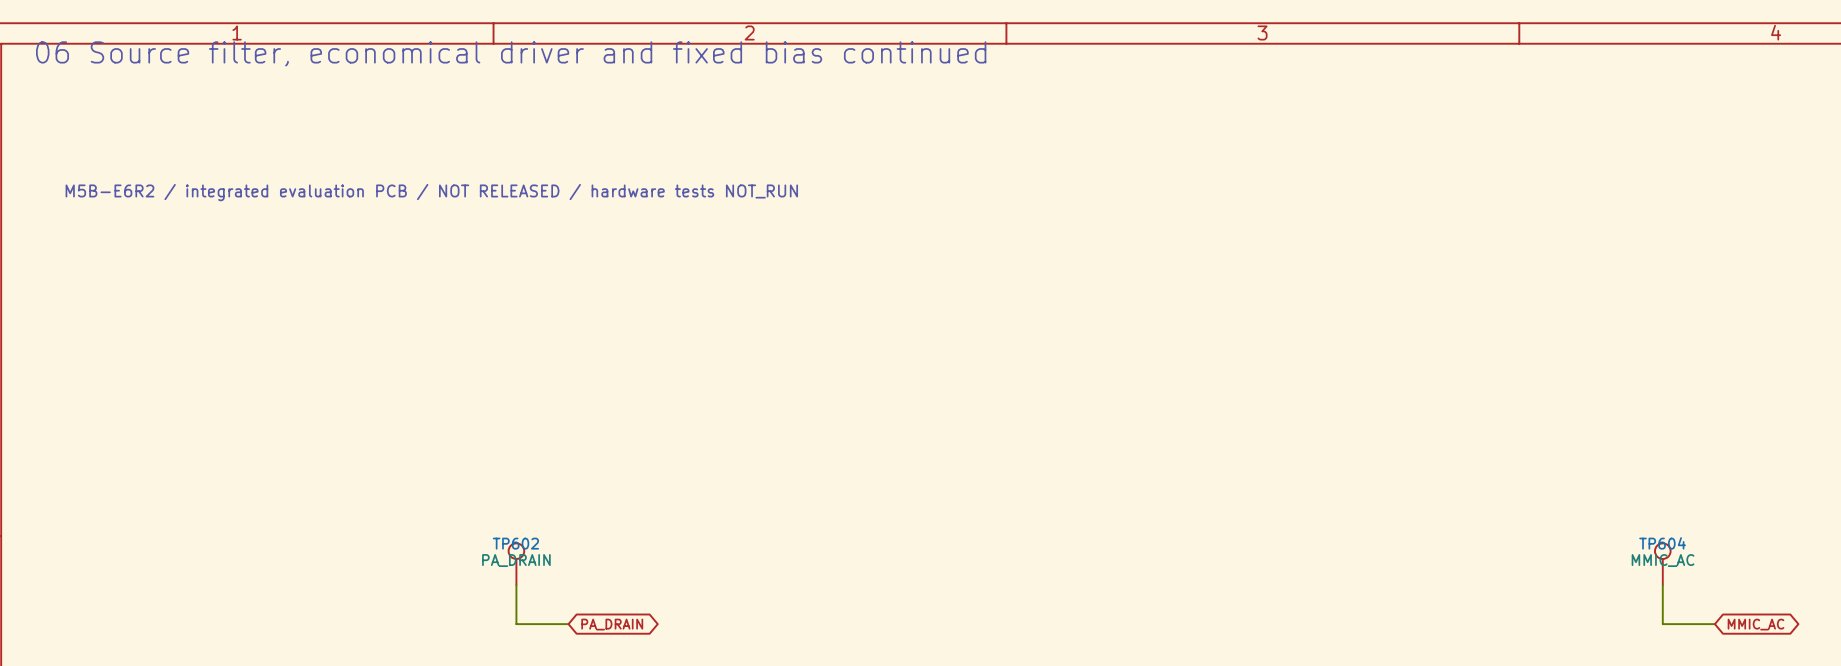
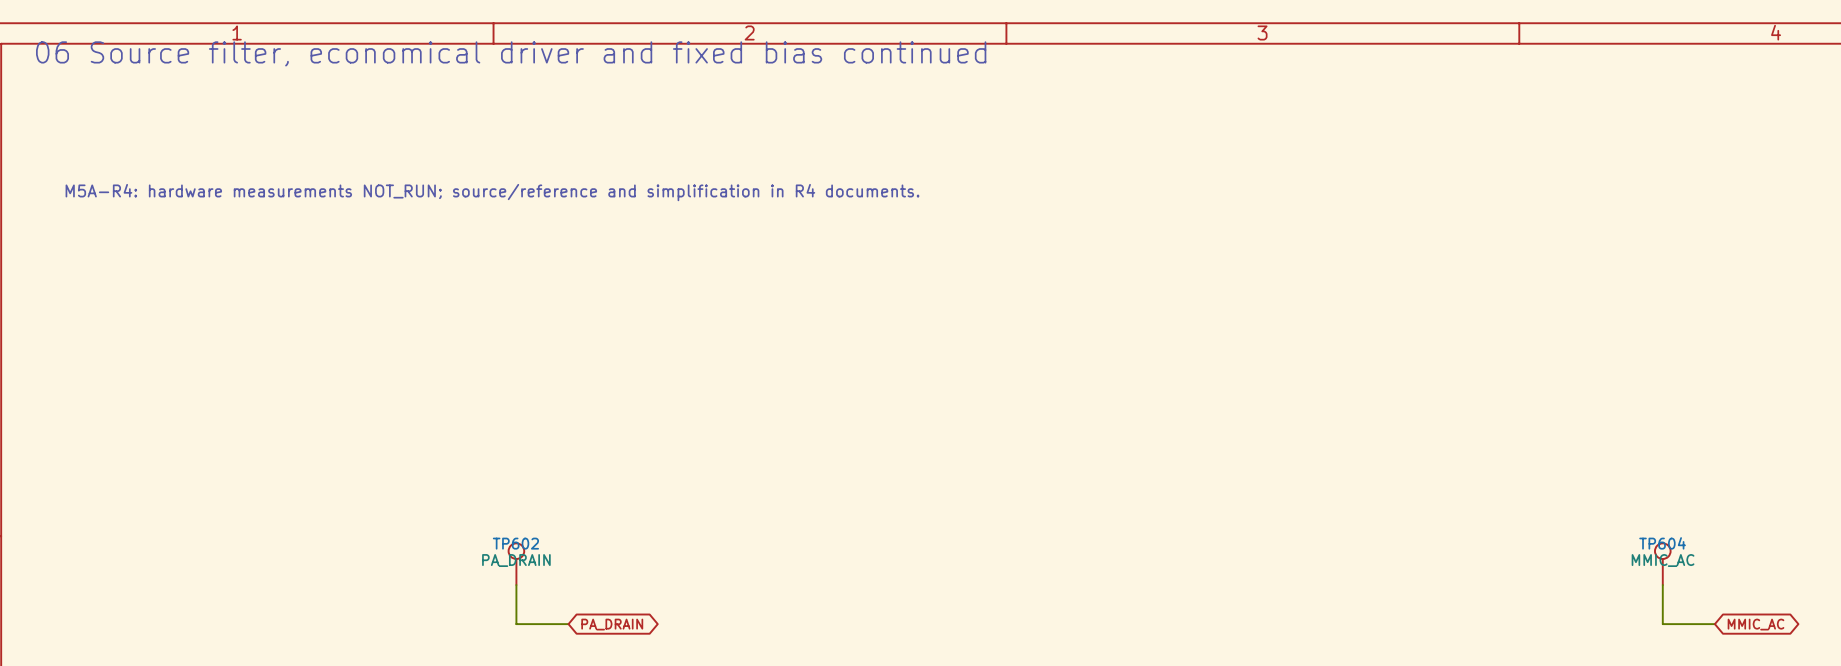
text: M5B-E6R2 / integrated evaluation PCB / NOT RELEASED / hardware tests NOT_RUN (431, 192) -> M5A-R4: hardware measurements NOT_RUN; source/reference and simplification in R4 documents. (492, 192)

